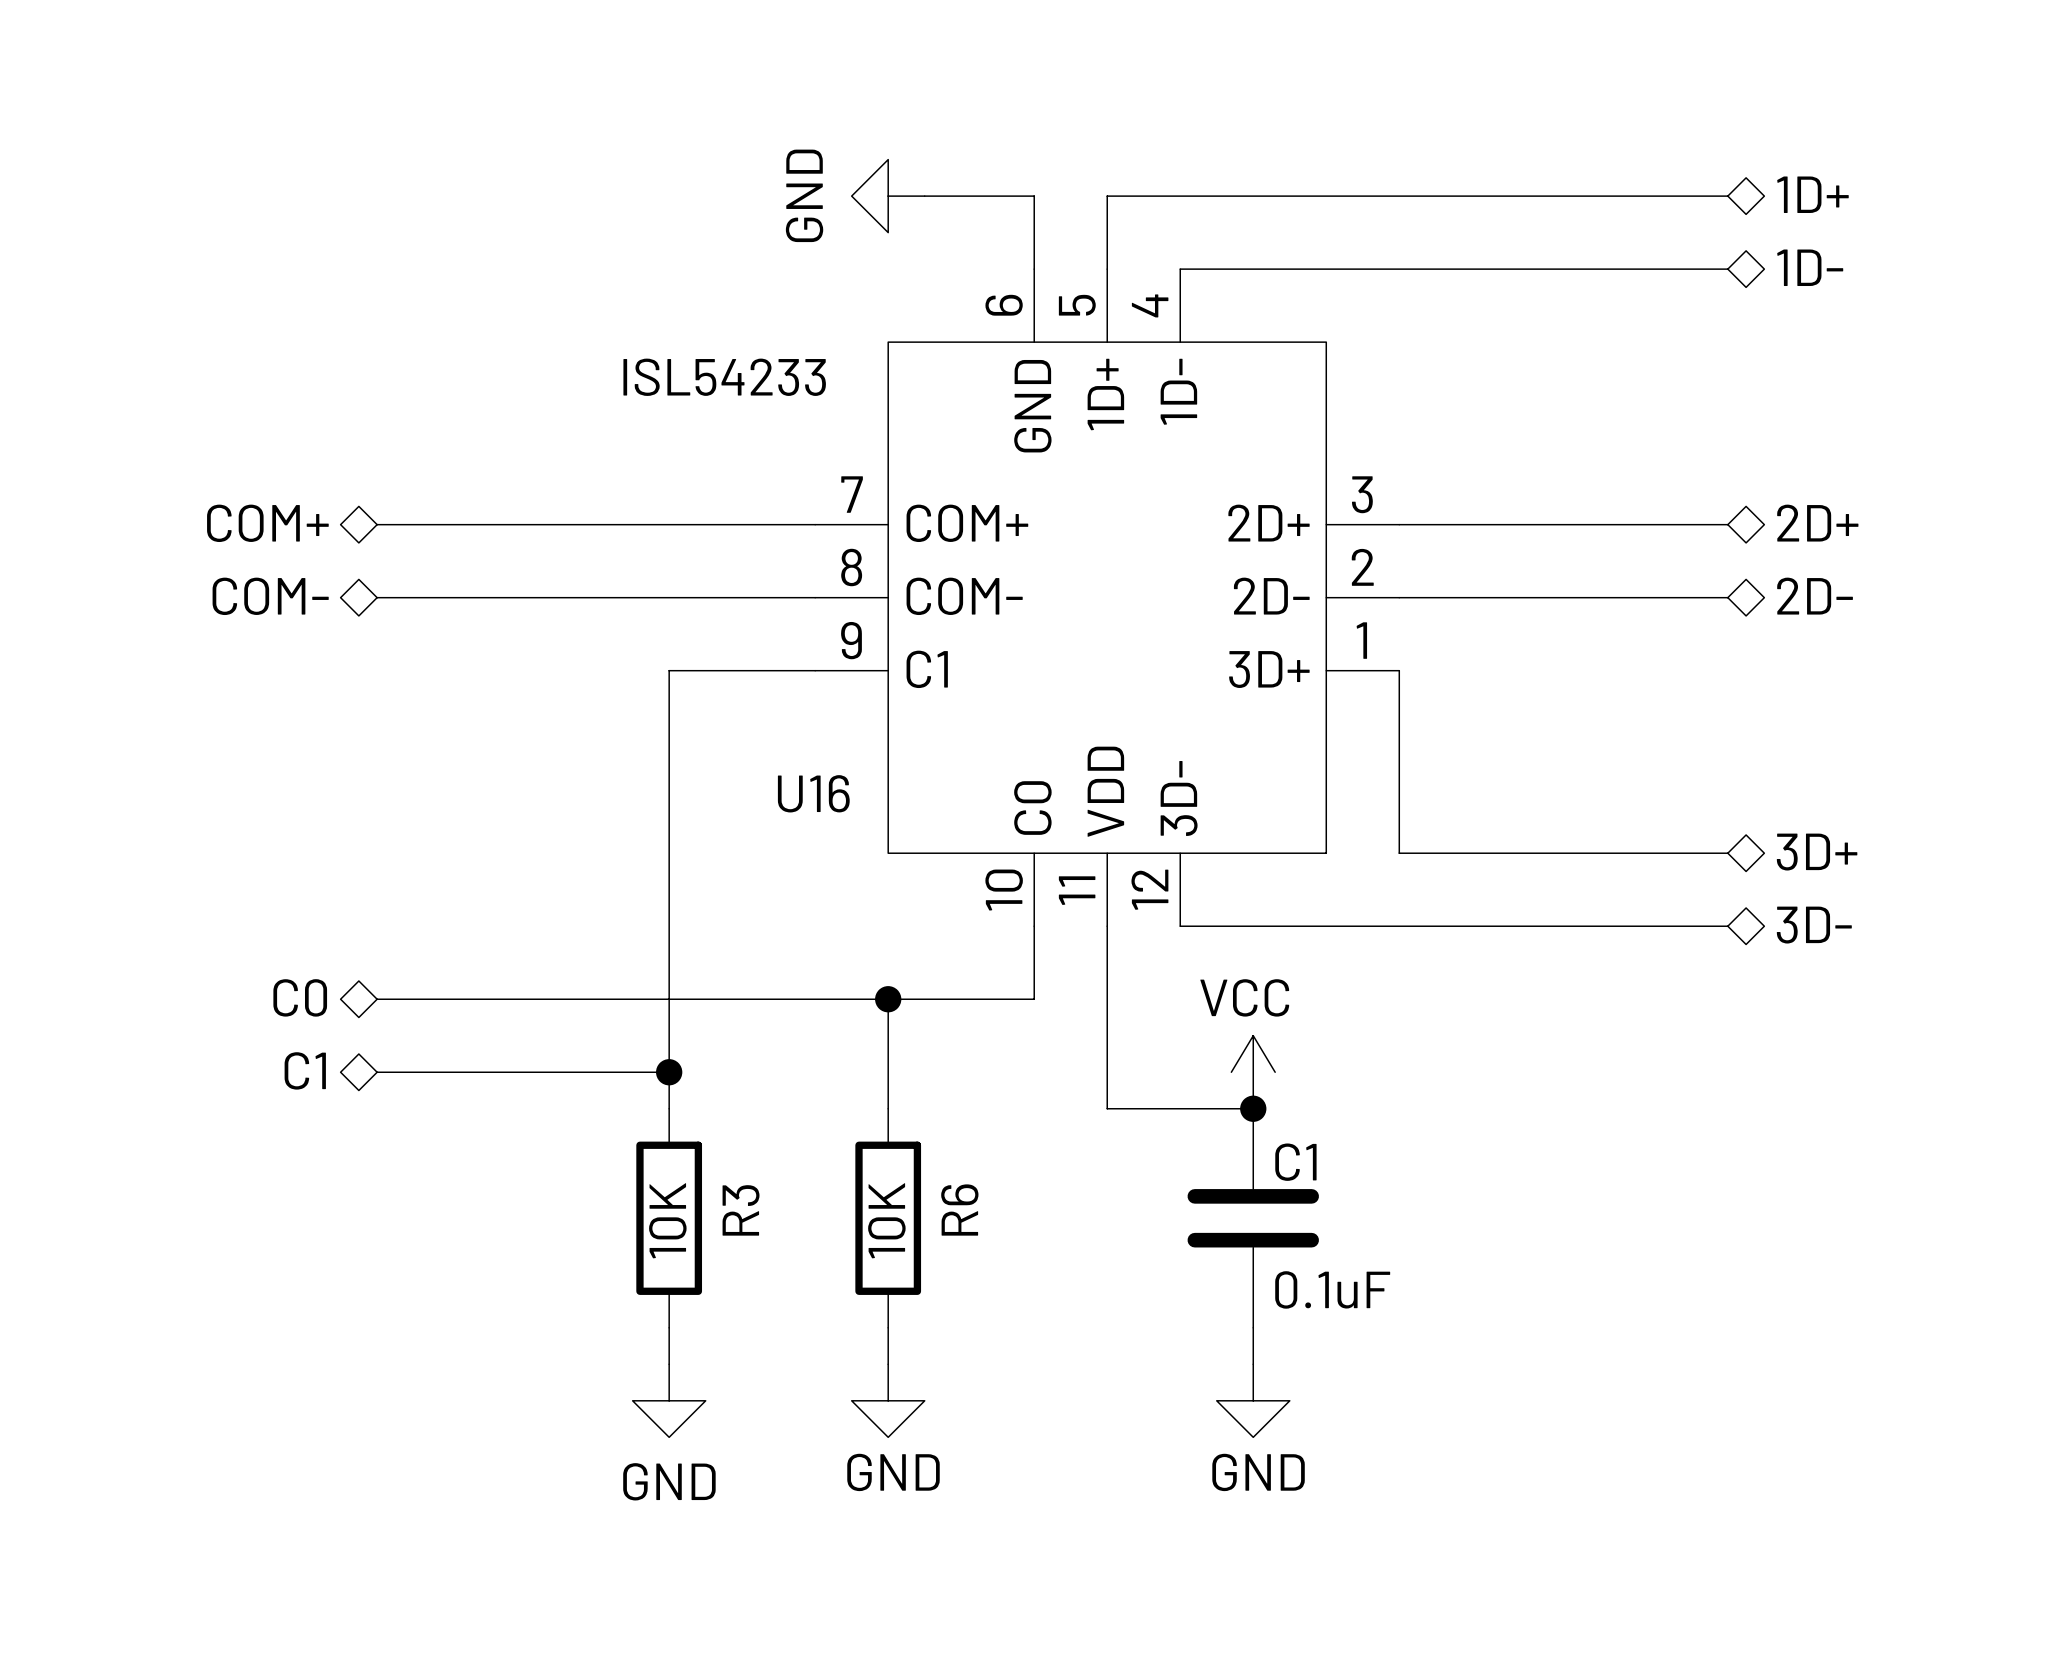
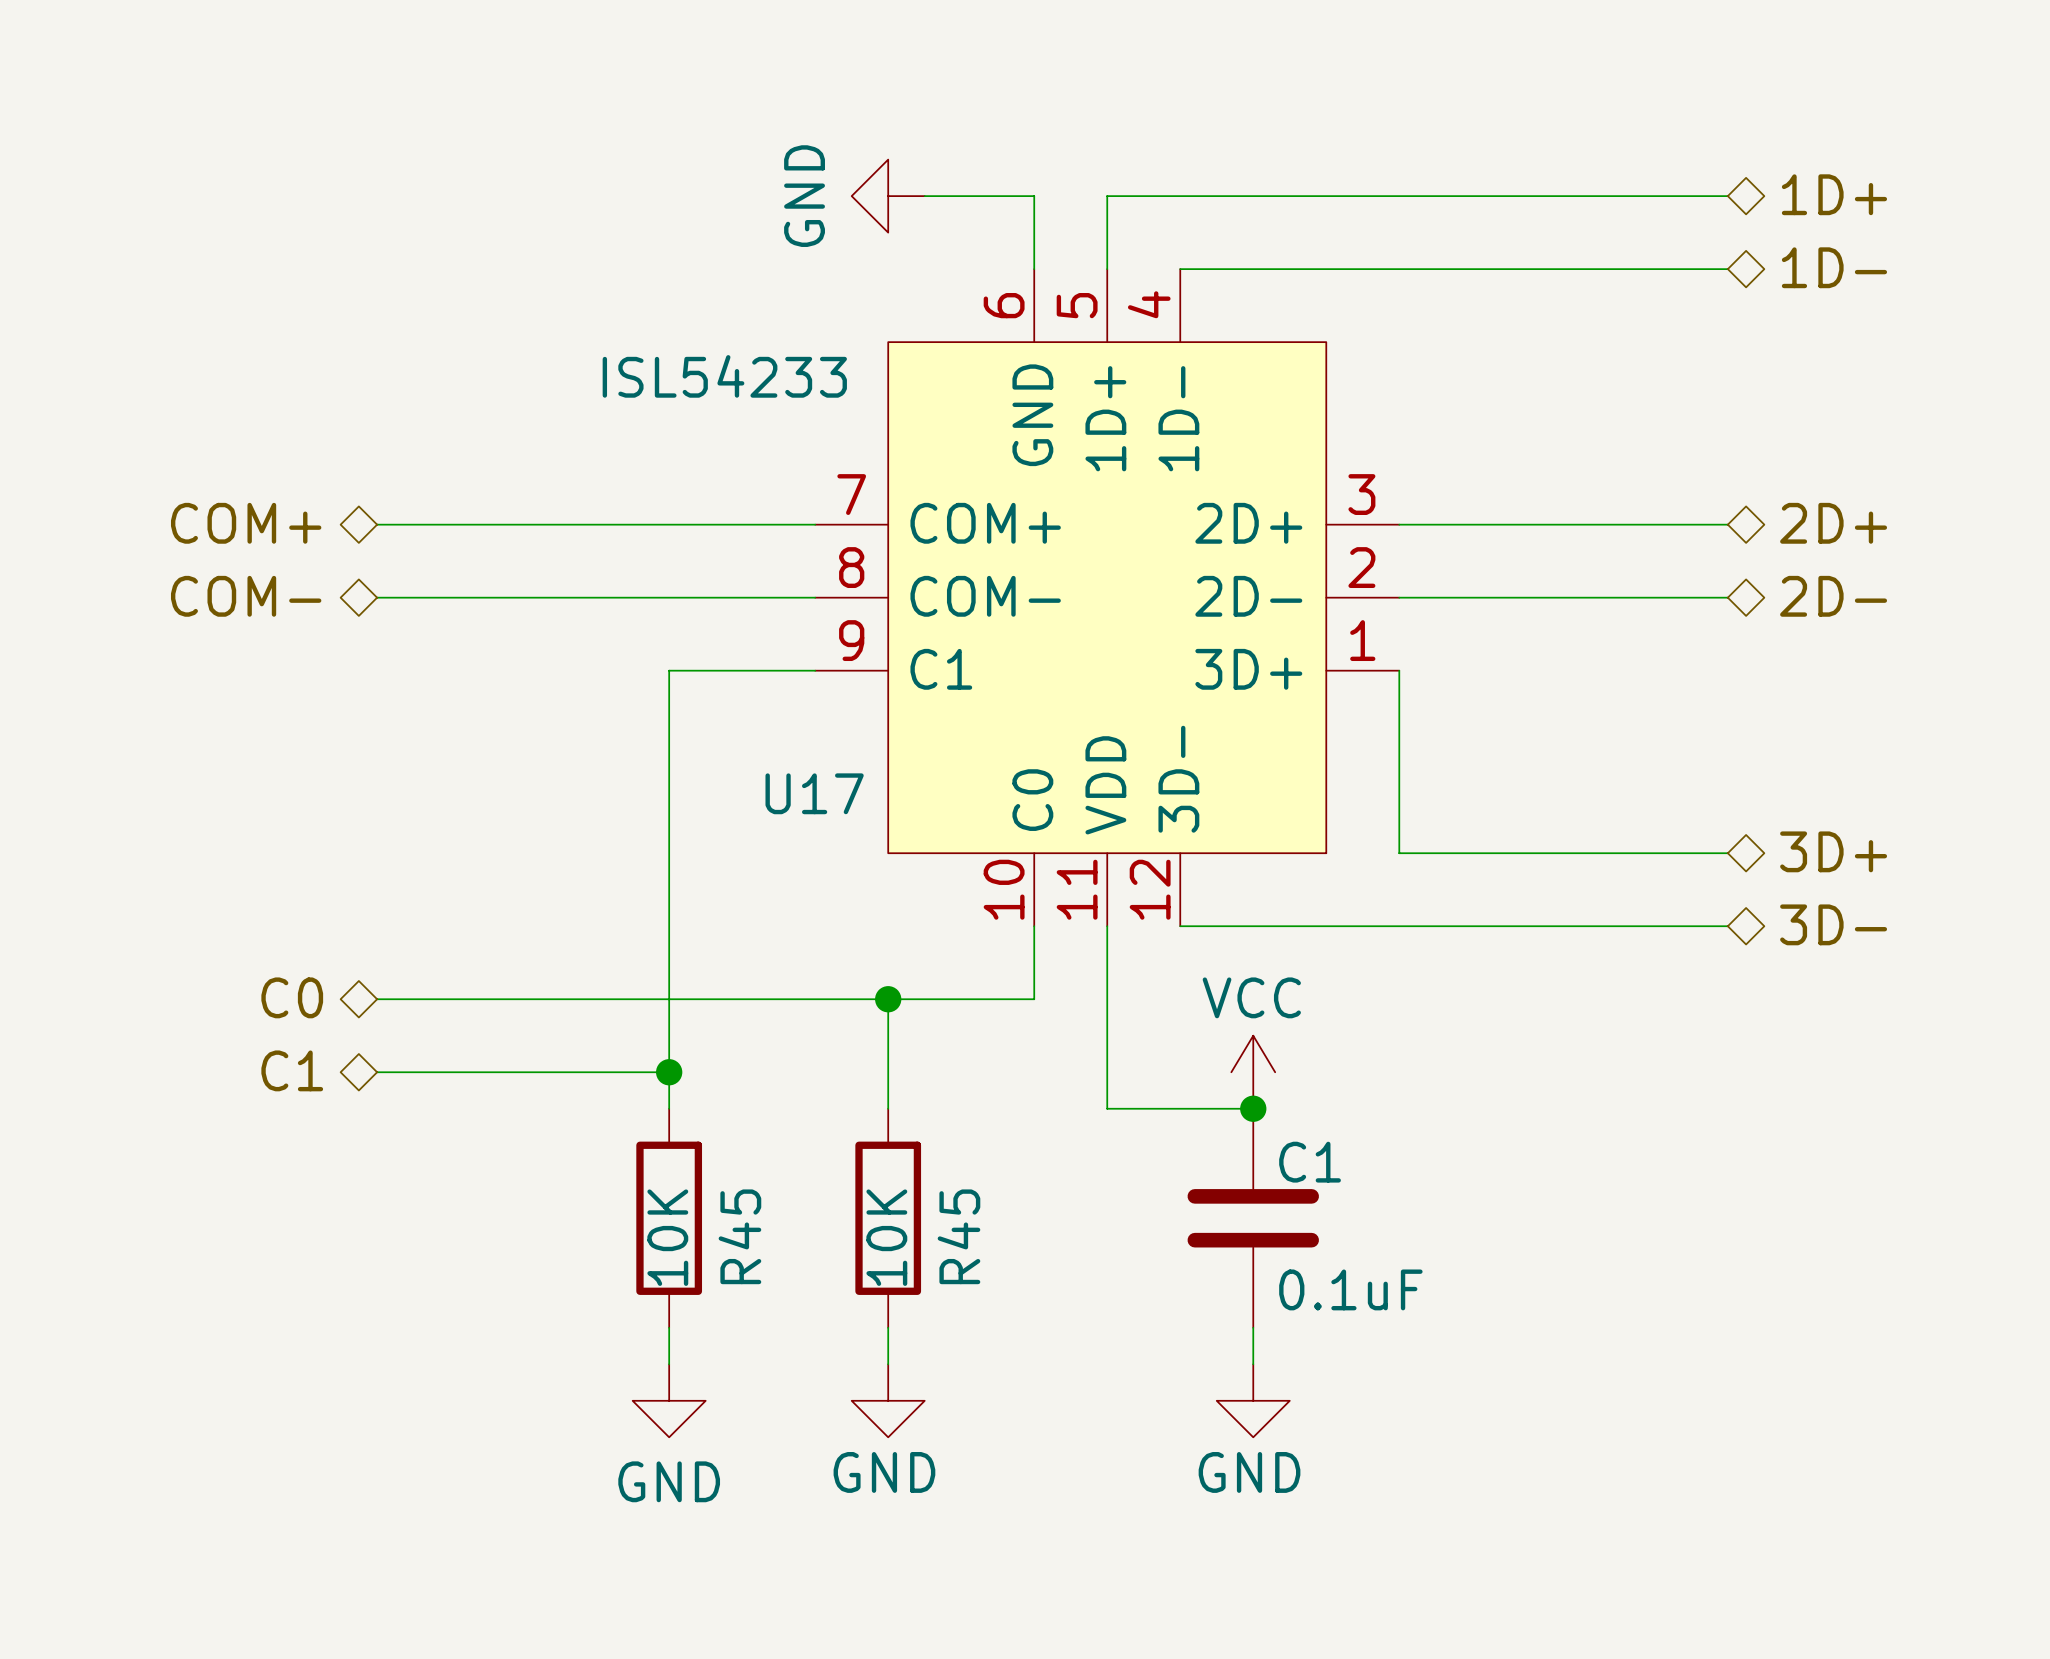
U16 name: U16 (813, 793) -> U17 (814, 793)
R3 name: R3 (741, 1210) -> R45 (739, 1236)
R6 name: R6 (959, 1210) -> R45 (958, 1236)

